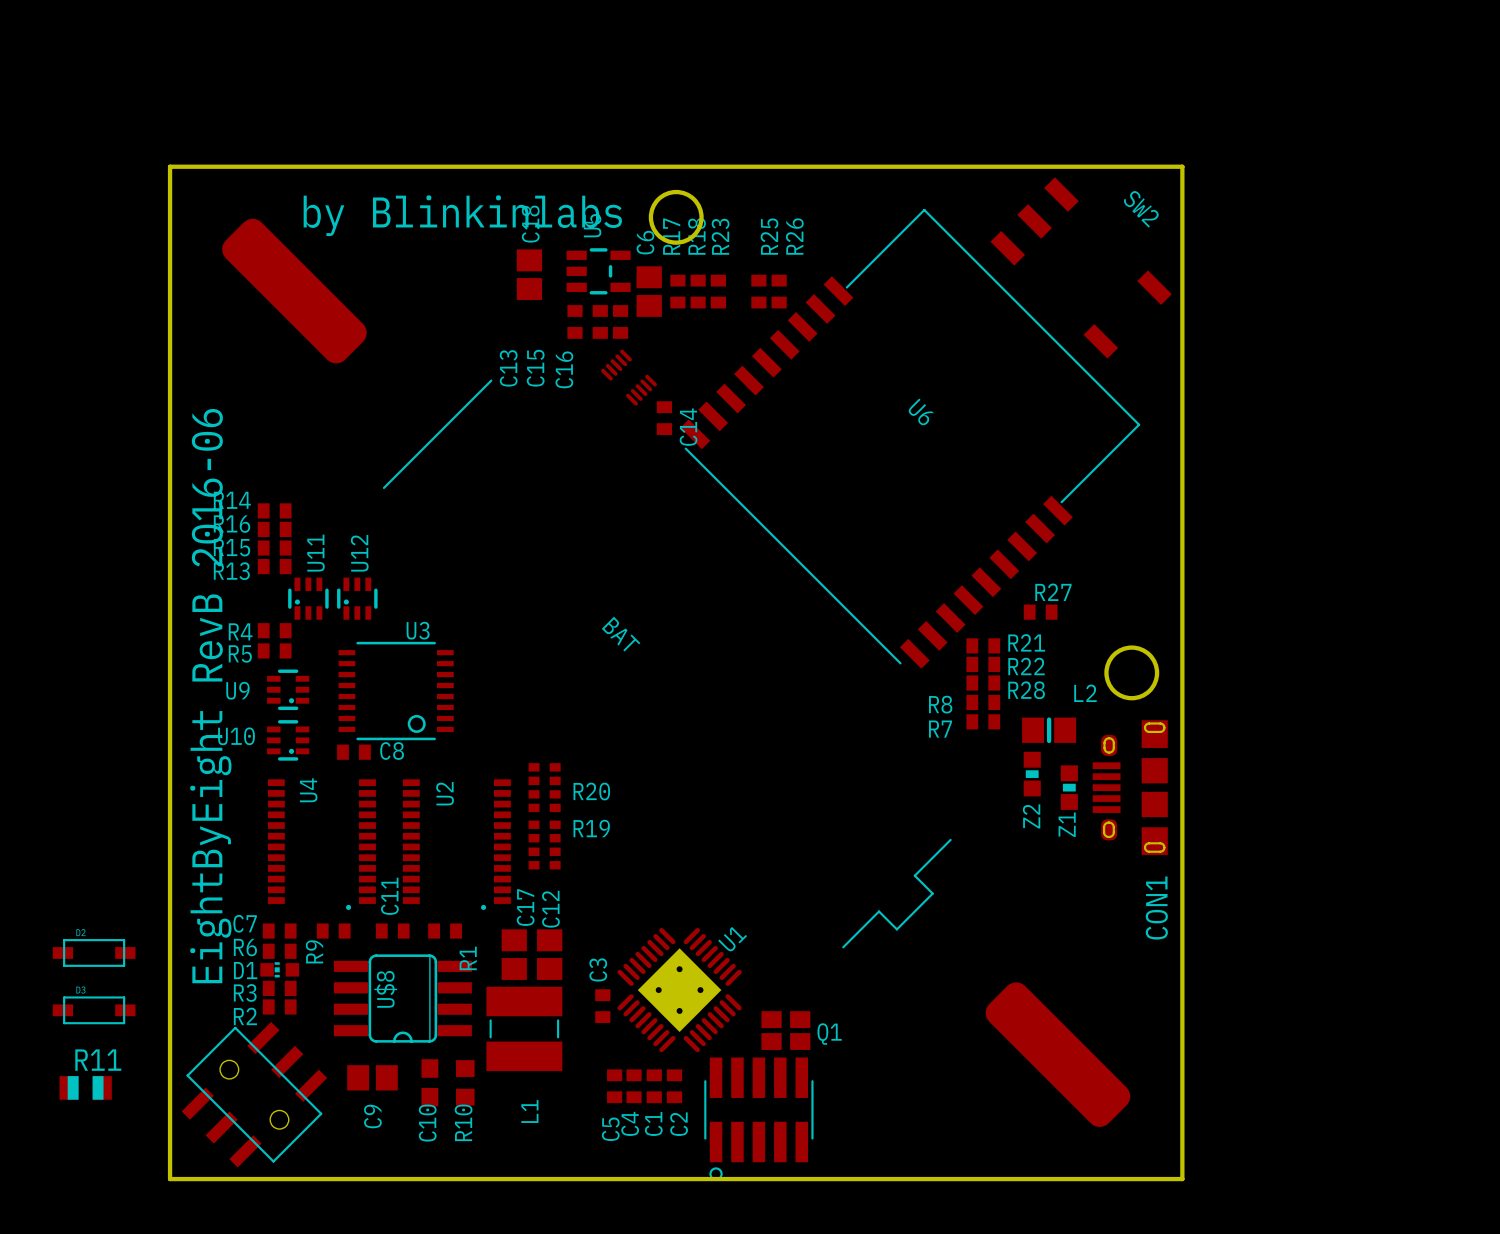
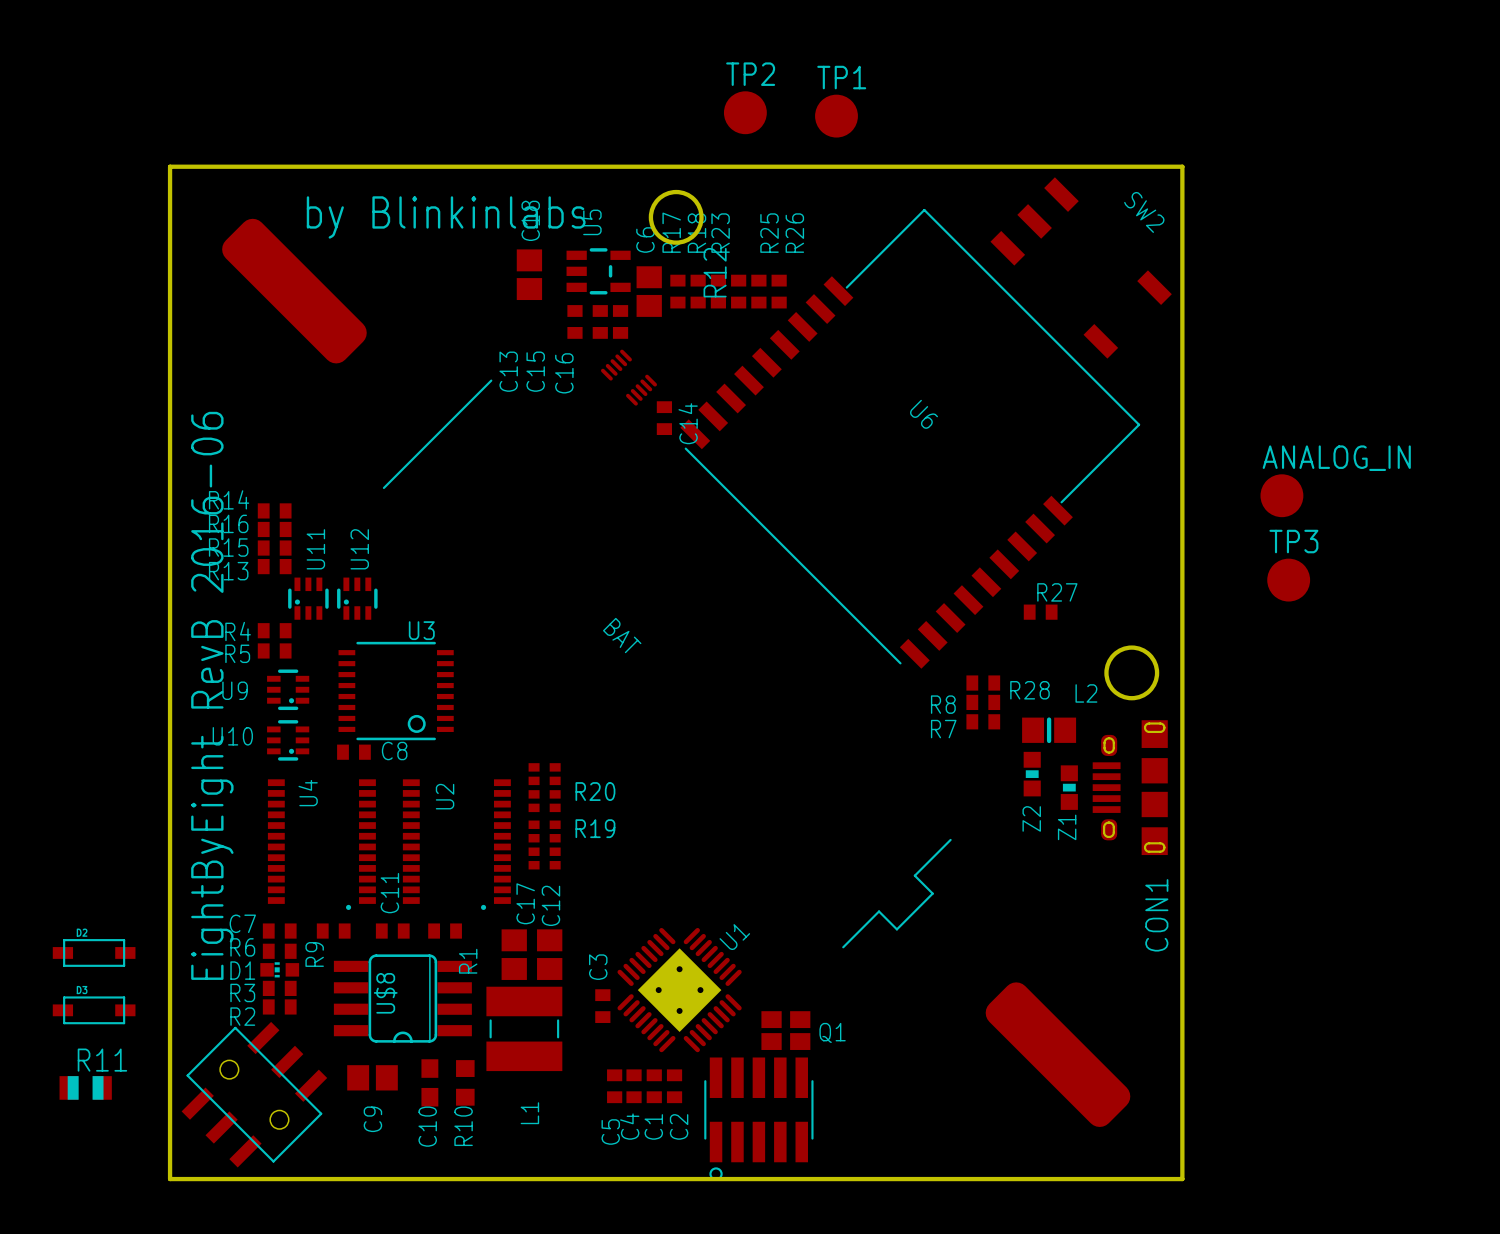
TP2: none -> (745, 112)
TP1: none -> (836, 116)
R12: none -> (738, 291)
ANALOG_IN: none -> (1281, 495)
TP3: none -> (1288, 580)
R21: (983, 645) -> none
R22: (983, 664) -> none

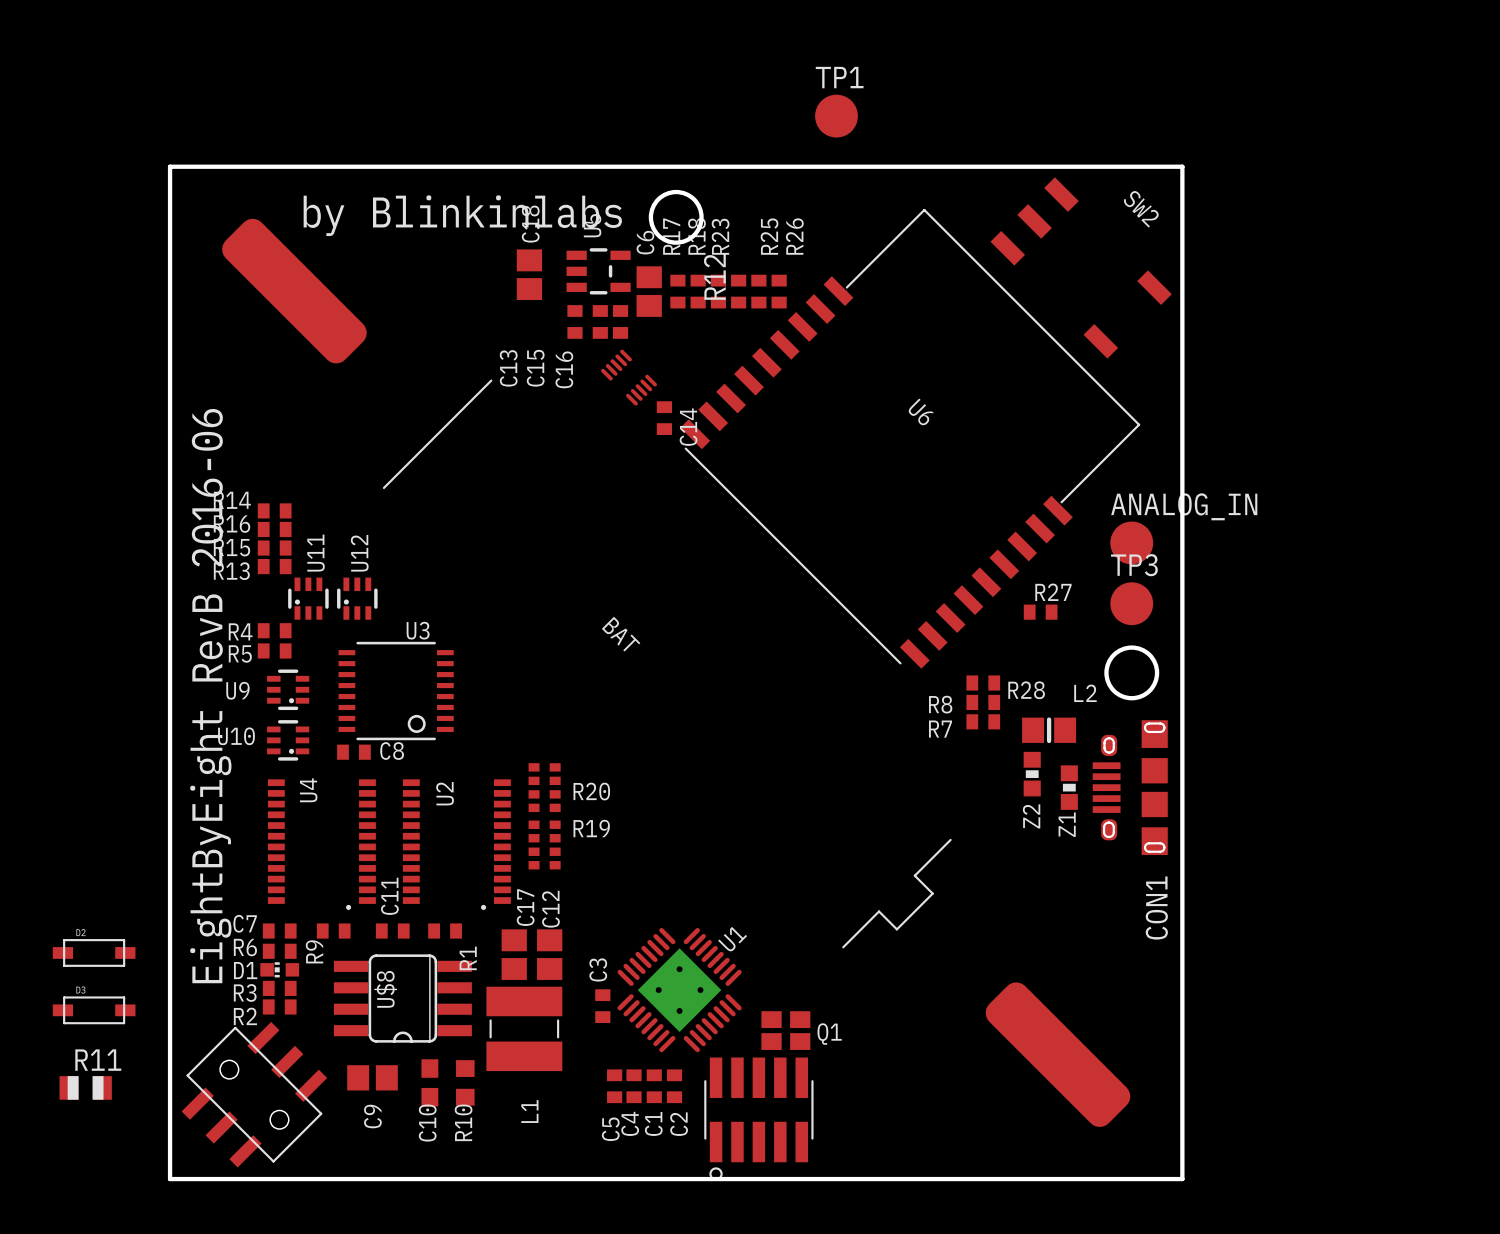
TP2: (745, 112) -> none
ANALOG_IN position: (1281, 495) -> (1131, 542)
TP3 position: (1288, 580) -> (1131, 603)

